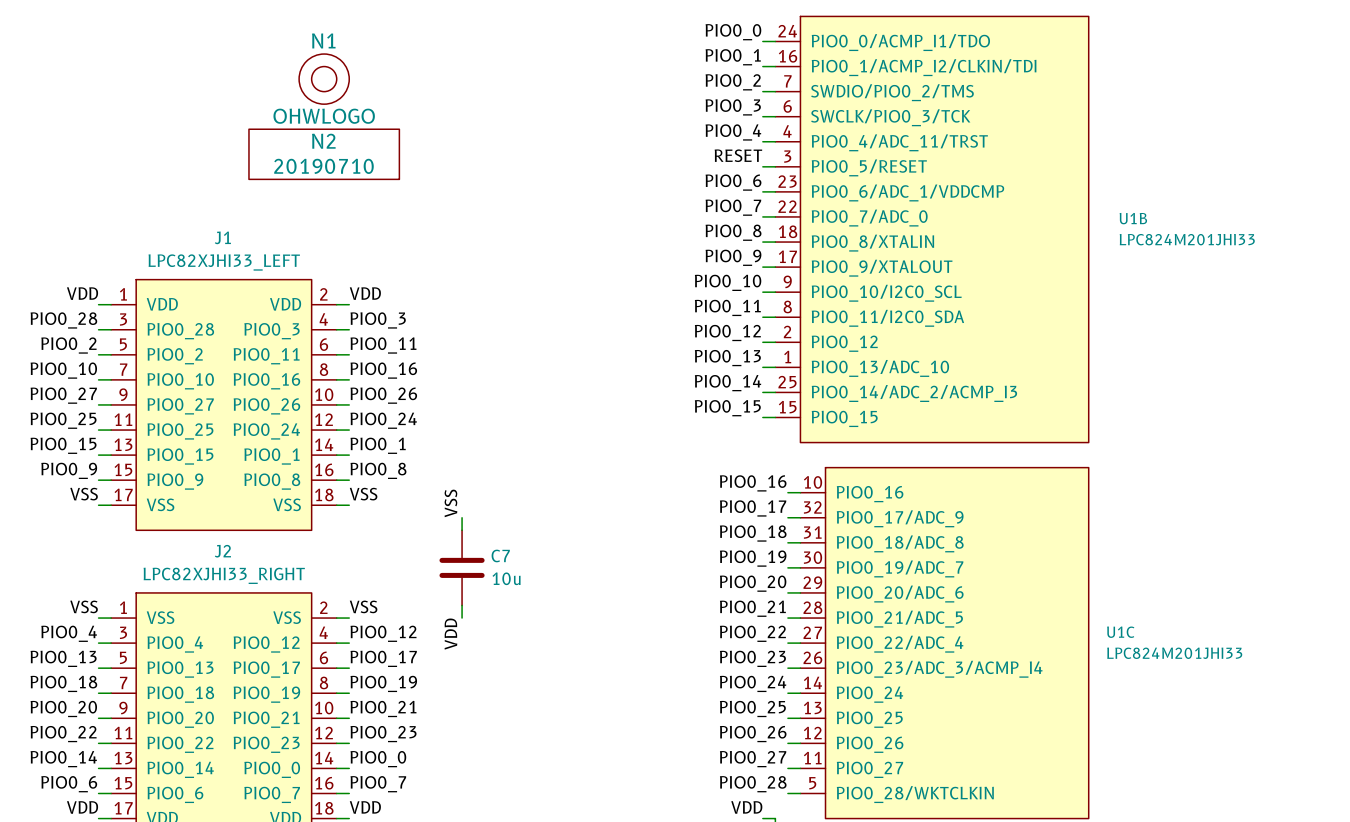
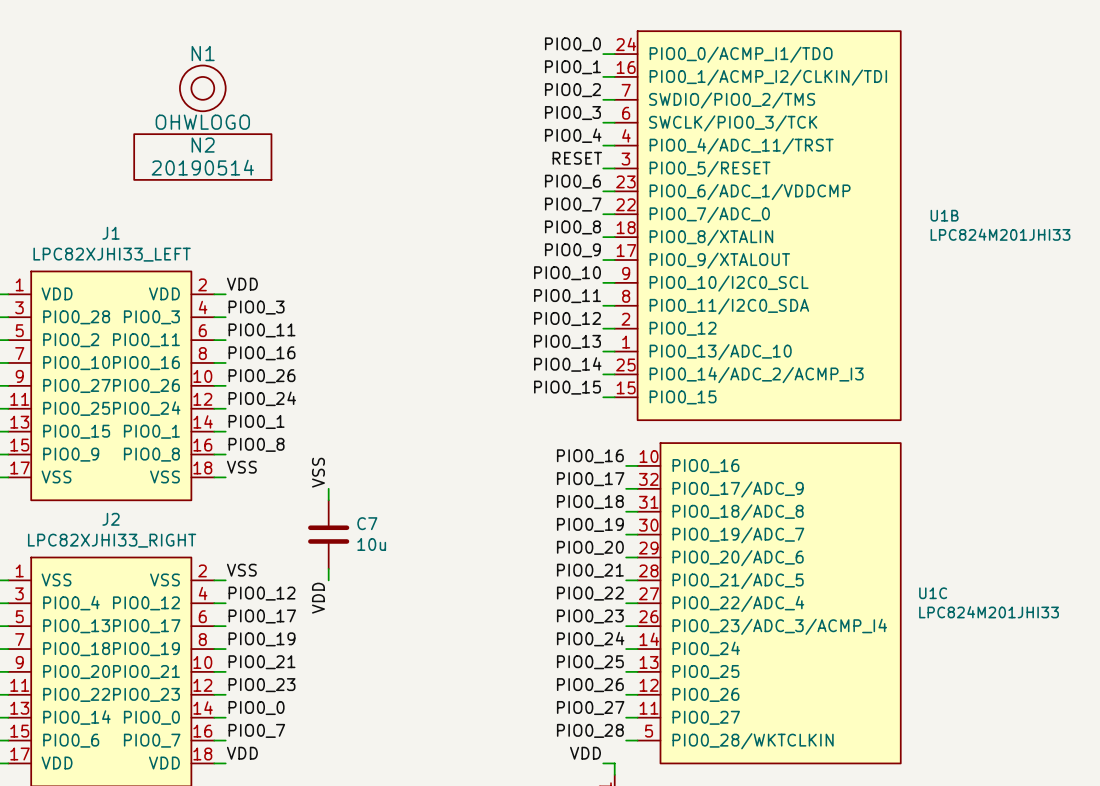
N2 value: 20190710 (323, 166) -> 20190514 (202, 167)

